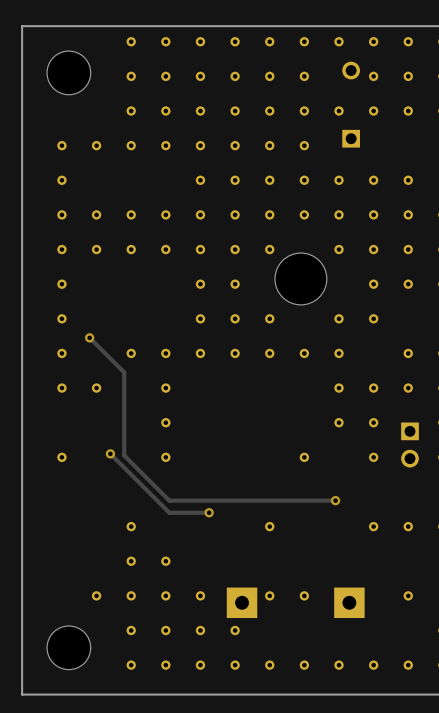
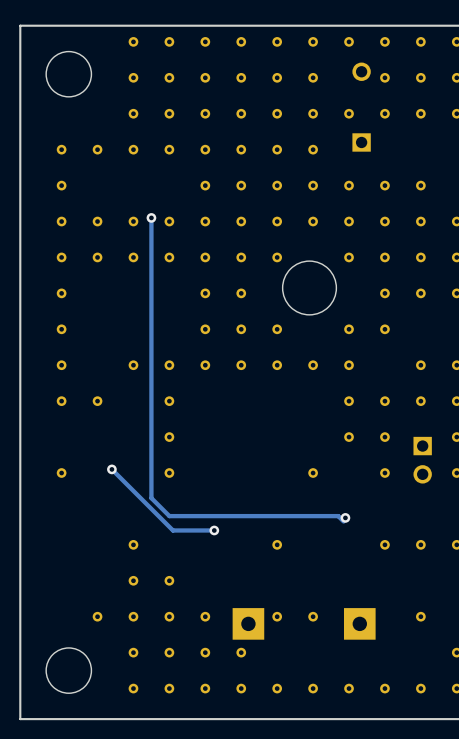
track: none -> (151, 217) (151, 498) (169, 516) (338, 516) (343, 521)
via: none -> (151, 217)
track: (89, 337) (124, 372) (124, 455) (169, 500) (335, 500) -> none
via: (89, 337) -> none

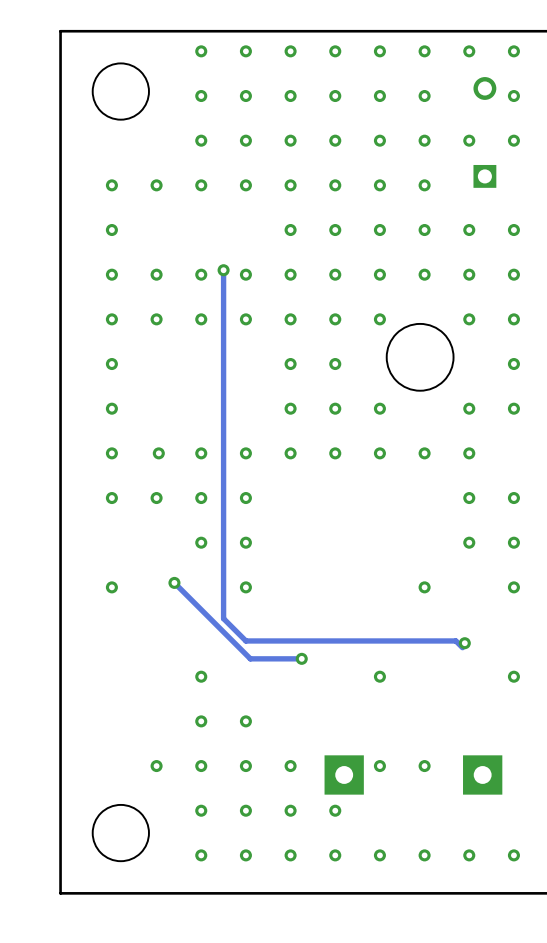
part: none -> (158, 453)
part: none -> (201, 498)
part: none -> (201, 542)

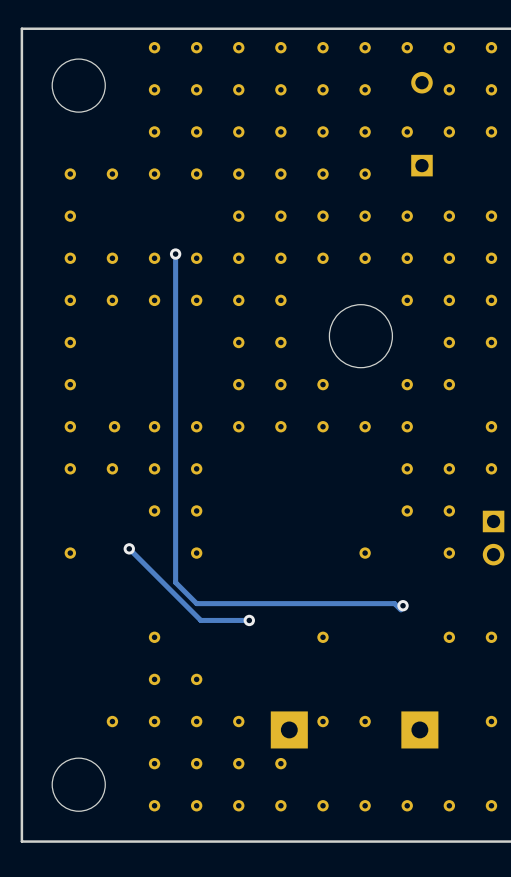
part: (379, 319) -> none

